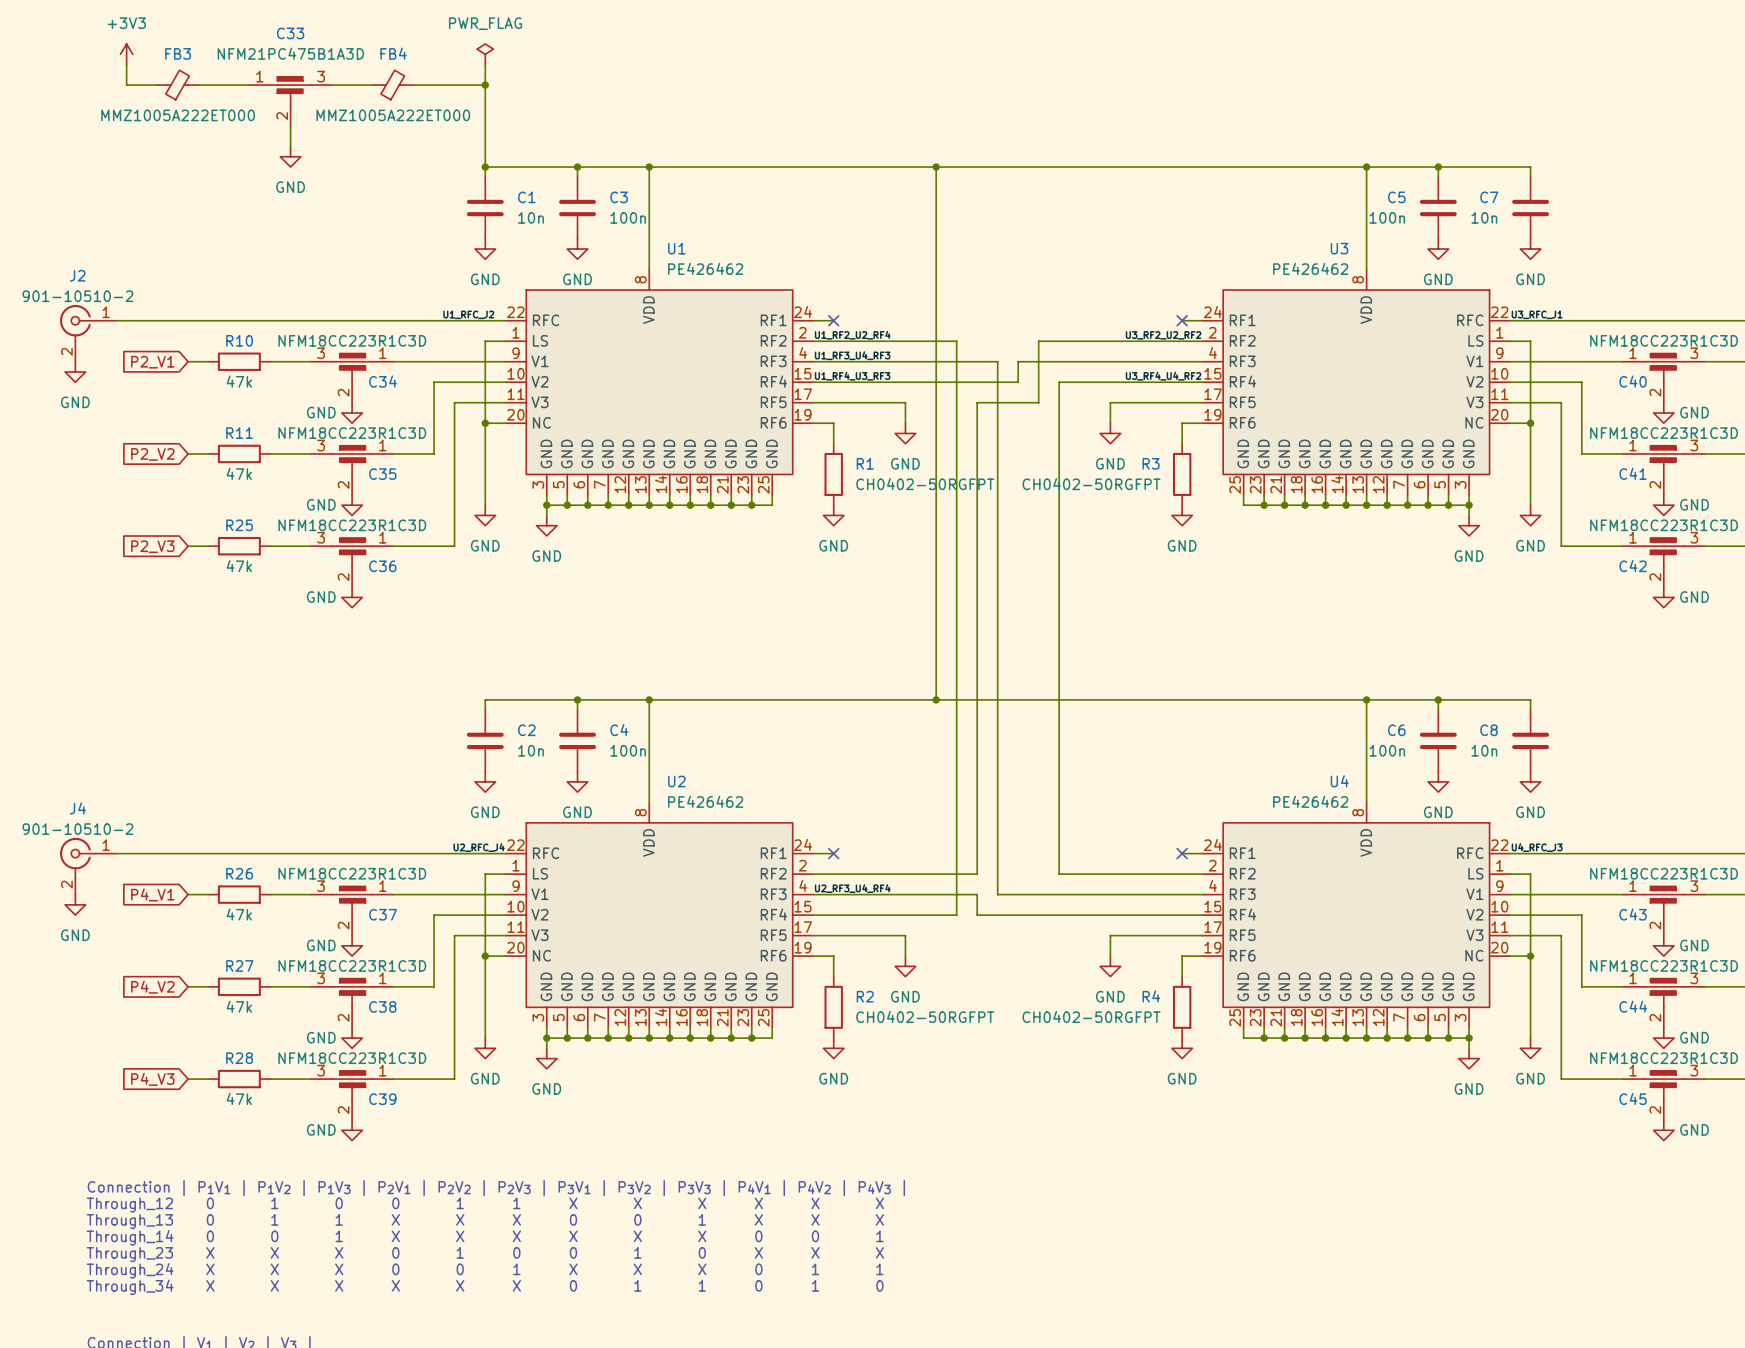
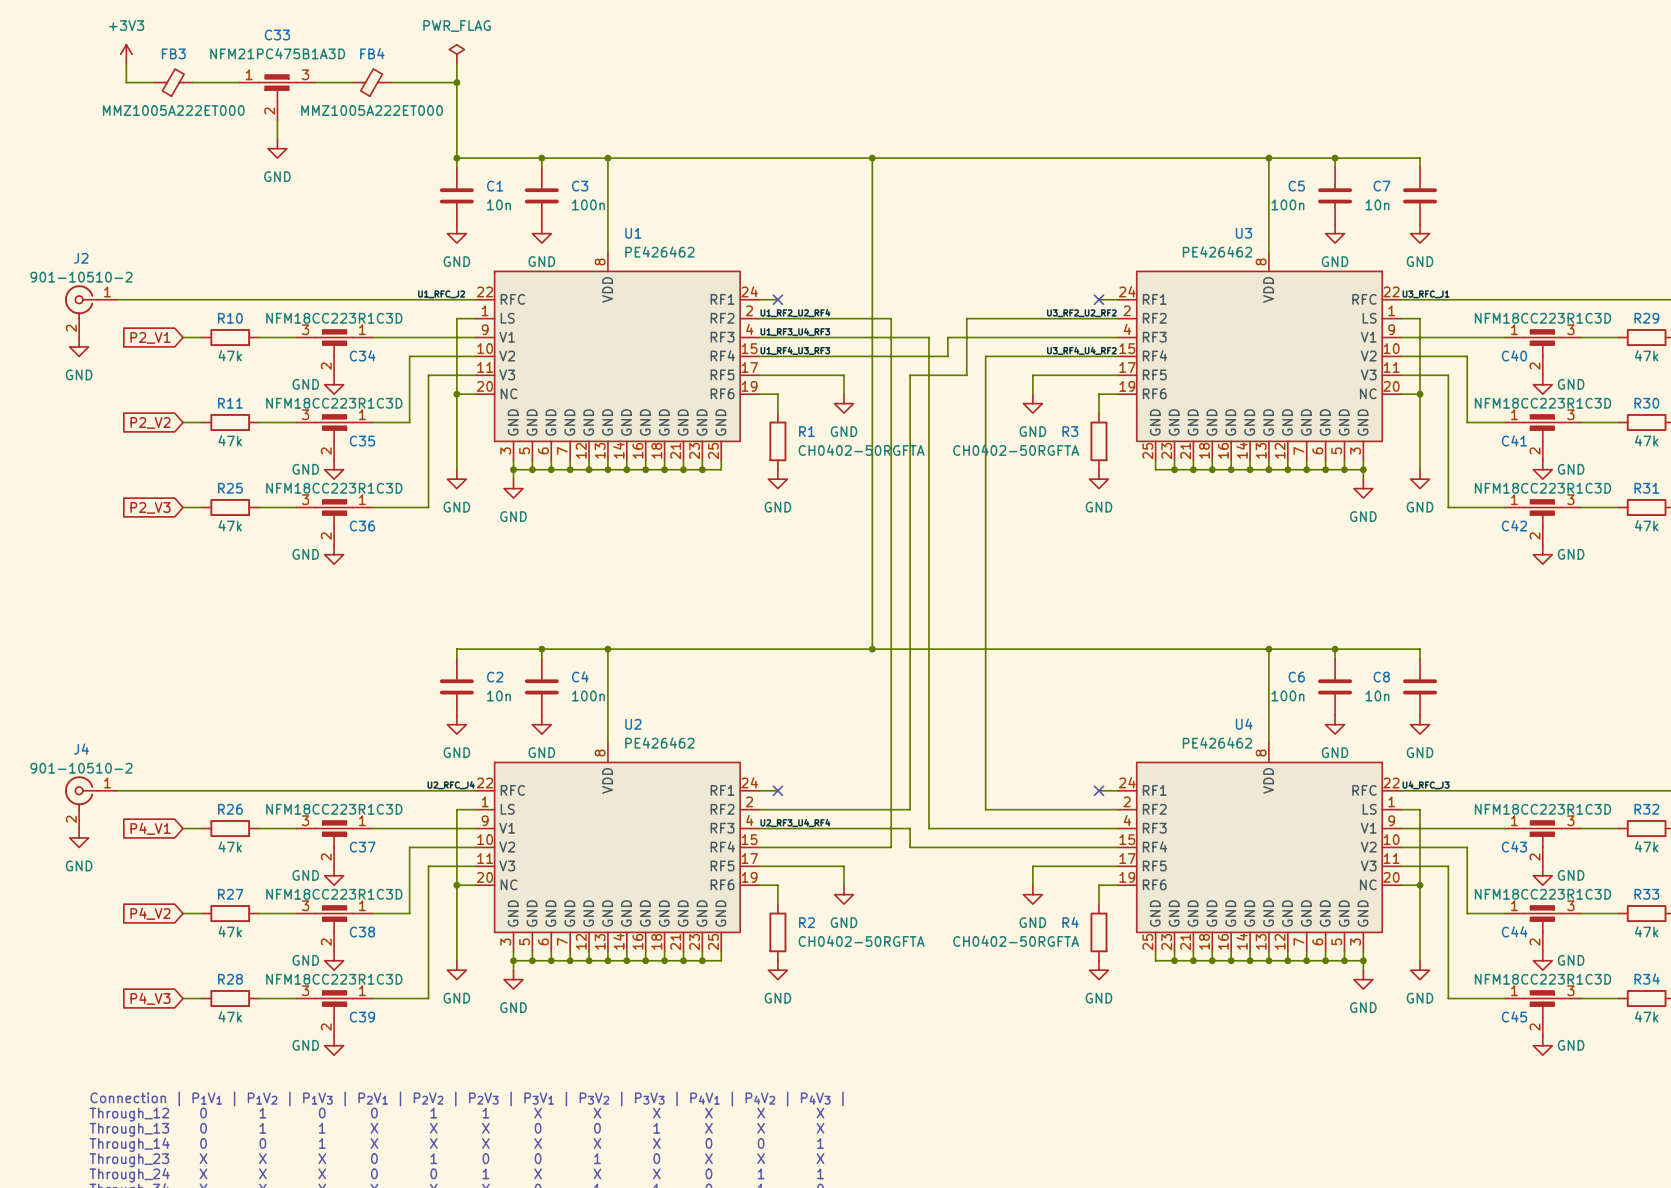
R1 value: CH0402-50RGFPT (925, 484) -> CH0402-50RGFTA (861, 450)
R3 value: CH0402-50RGFPT (1091, 484) -> CH0402-50RGFTA (1016, 450)
R2 value: CH0402-50RGFPT (925, 1016) -> CH0402-50RGFTA (861, 941)
R4 value: CH0402-50RGFPT (1091, 1016) -> CH0402-50RGFTA (1016, 941)

